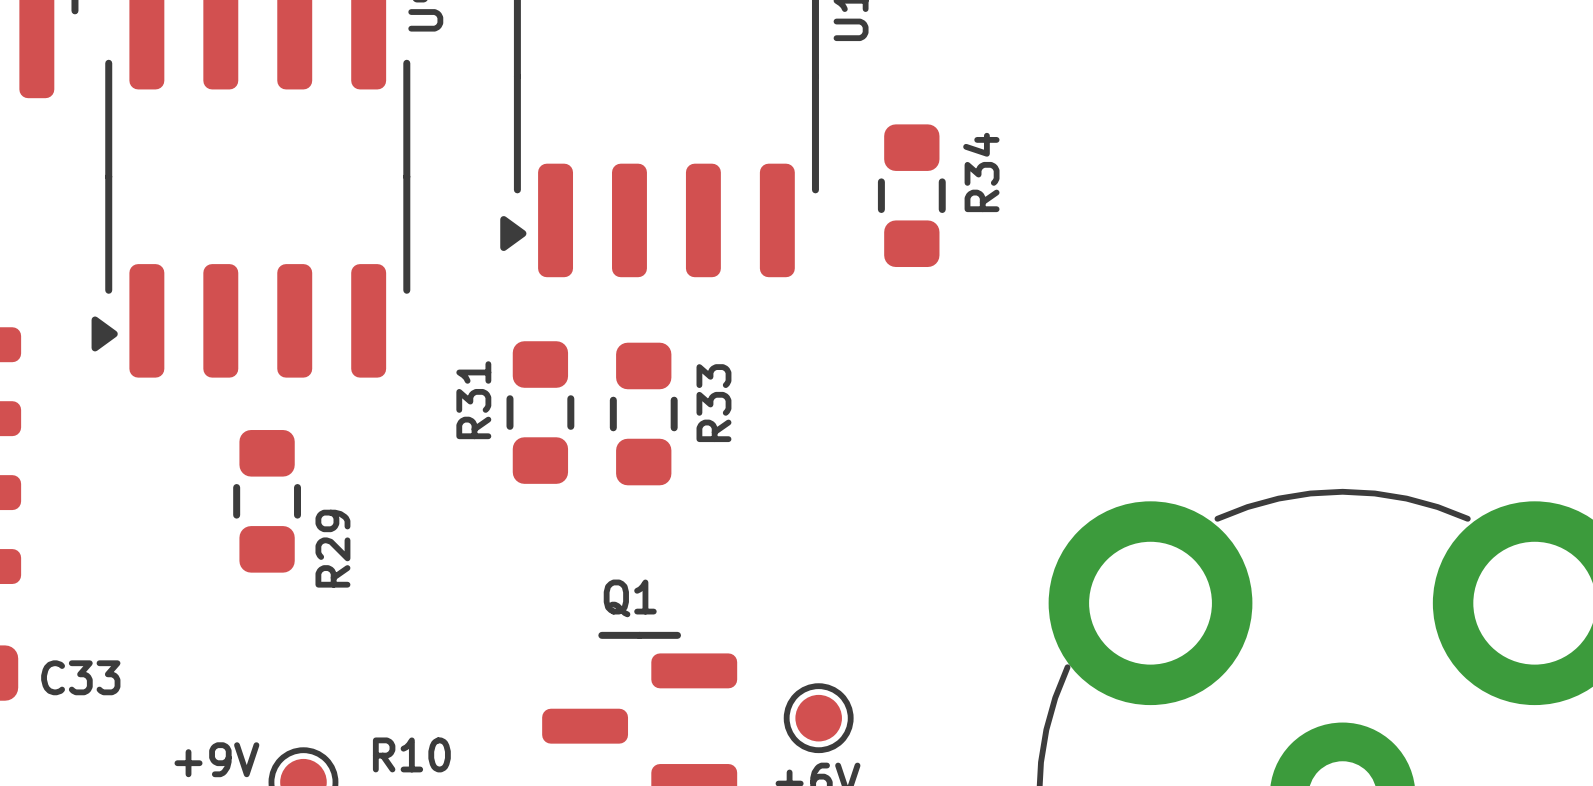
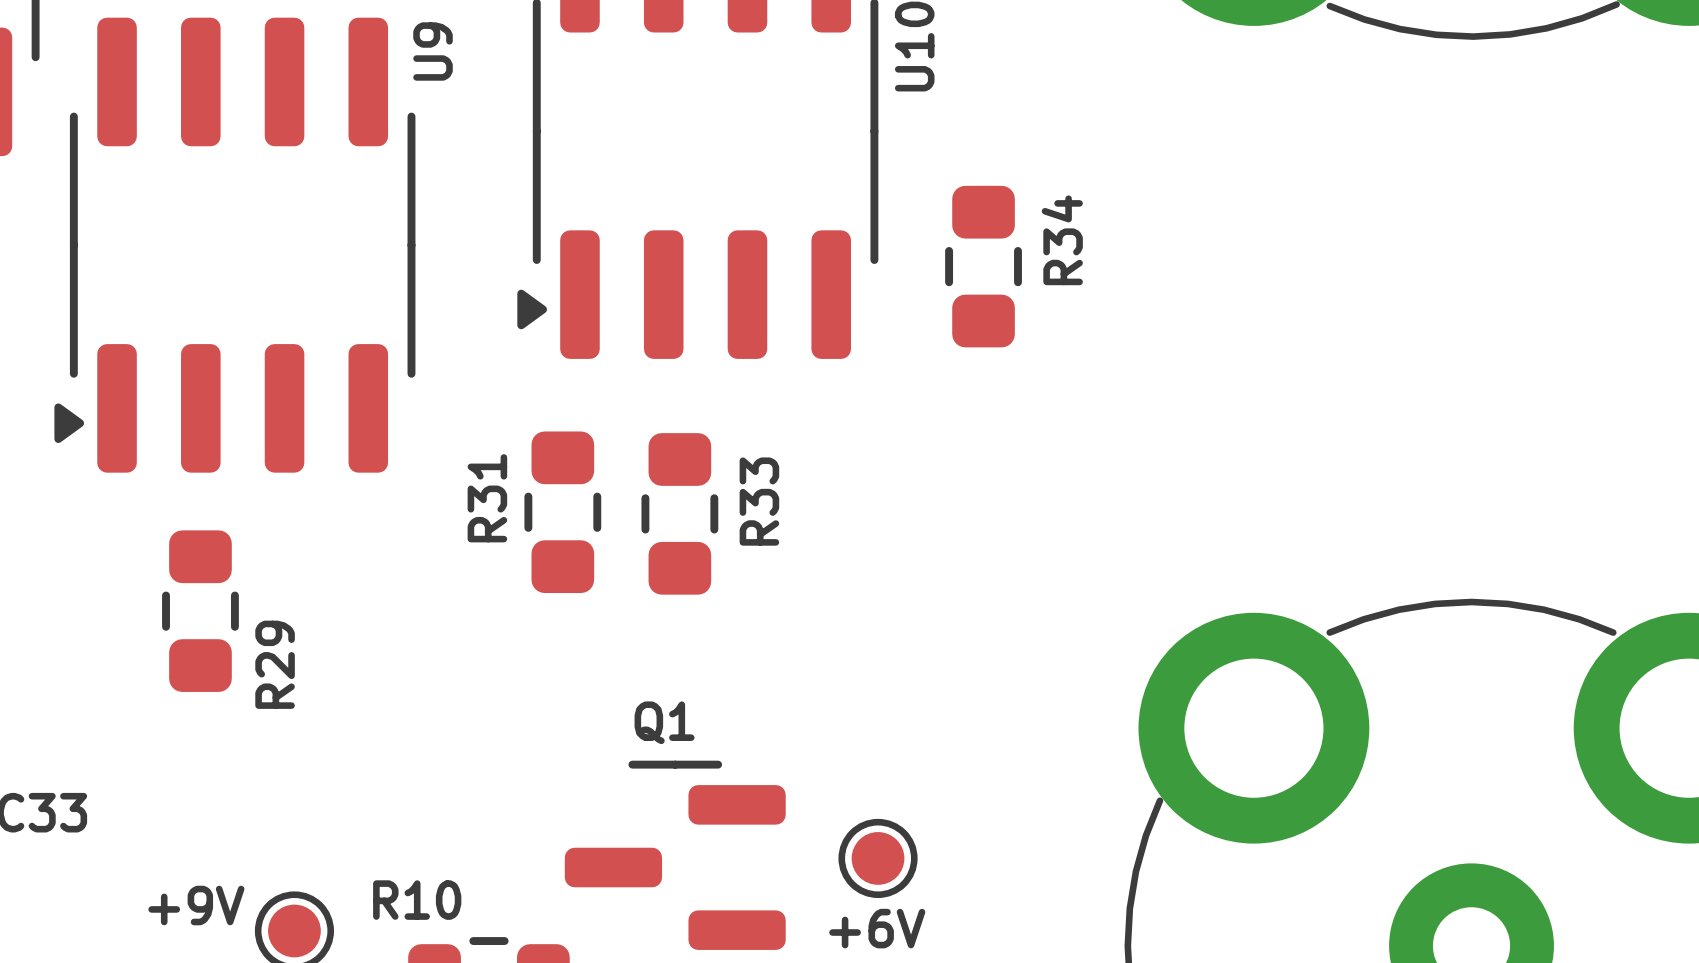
R29 position: (267, 501) -> (200, 611)

